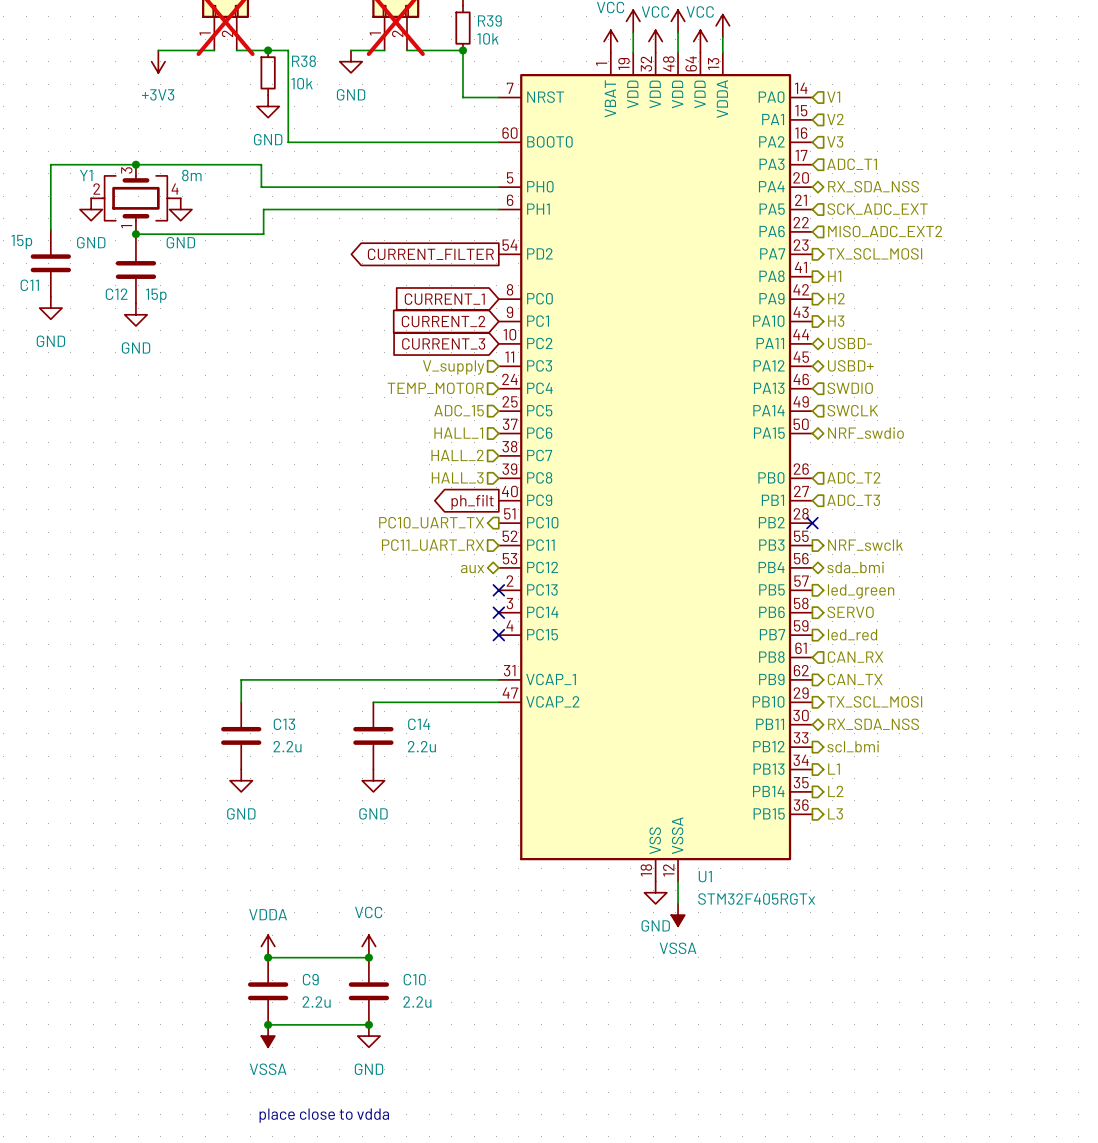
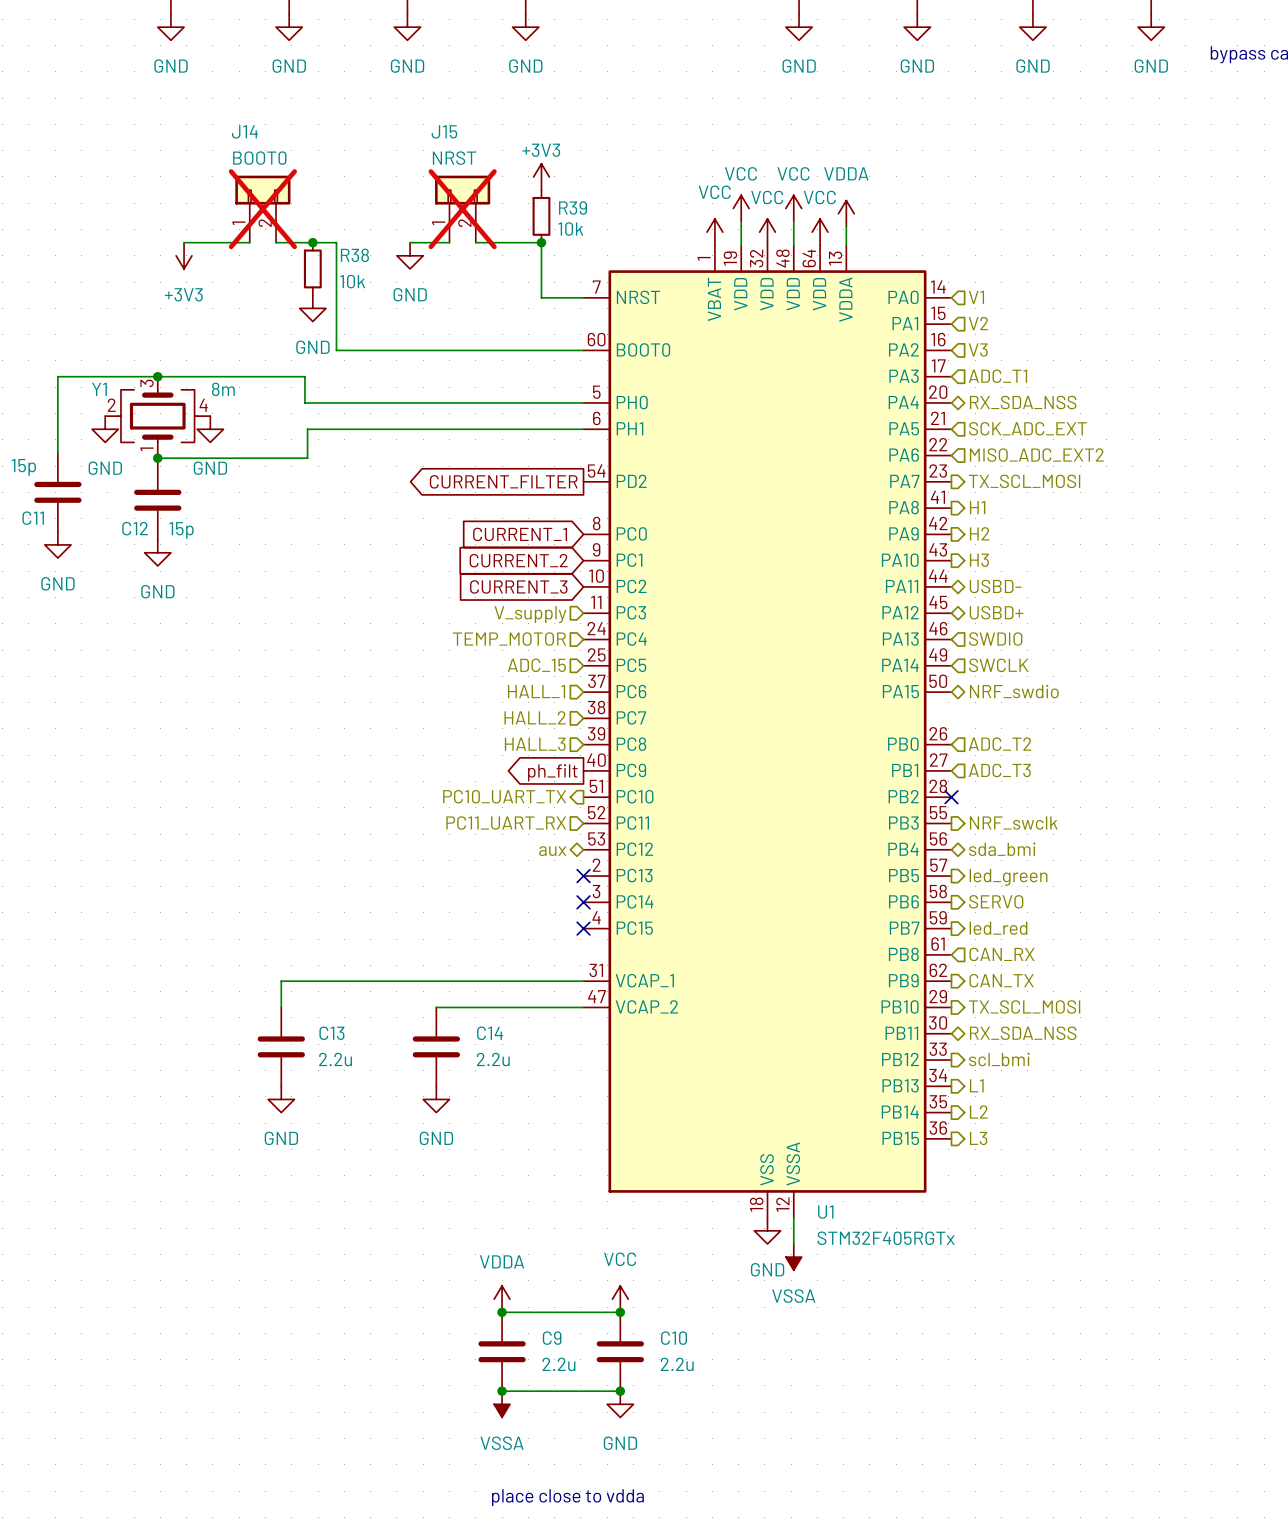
power symbol position: VDDA (268, 946) -> VDDA (502, 1299)
power symbol position: VCC (368, 946) -> VCC (620, 1299)
wire: (268, 957) (368, 957) -> (502, 1312) (620, 1312)
junction: (268, 957) -> none
junction: (368, 957) -> none
junction: none -> (502, 1312)
junction: none -> (620, 1312)
C9 position: (268, 991) -> (502, 1351)
C10 position: (368, 991) -> (620, 1351)
wire: (268, 1024) (368, 1024) -> (502, 1391) (620, 1391)
junction: (268, 1024) -> none
junction: (368, 1024) -> none
junction: none -> (502, 1391)
junction: none -> (620, 1391)
power symbol position: VSSA (268, 1036) -> VSSA (502, 1404)
power symbol position: GND (368, 1036) -> GND (620, 1404)
text position: place close to vdda (324, 1115) -> place close to vdda (567, 1497)

